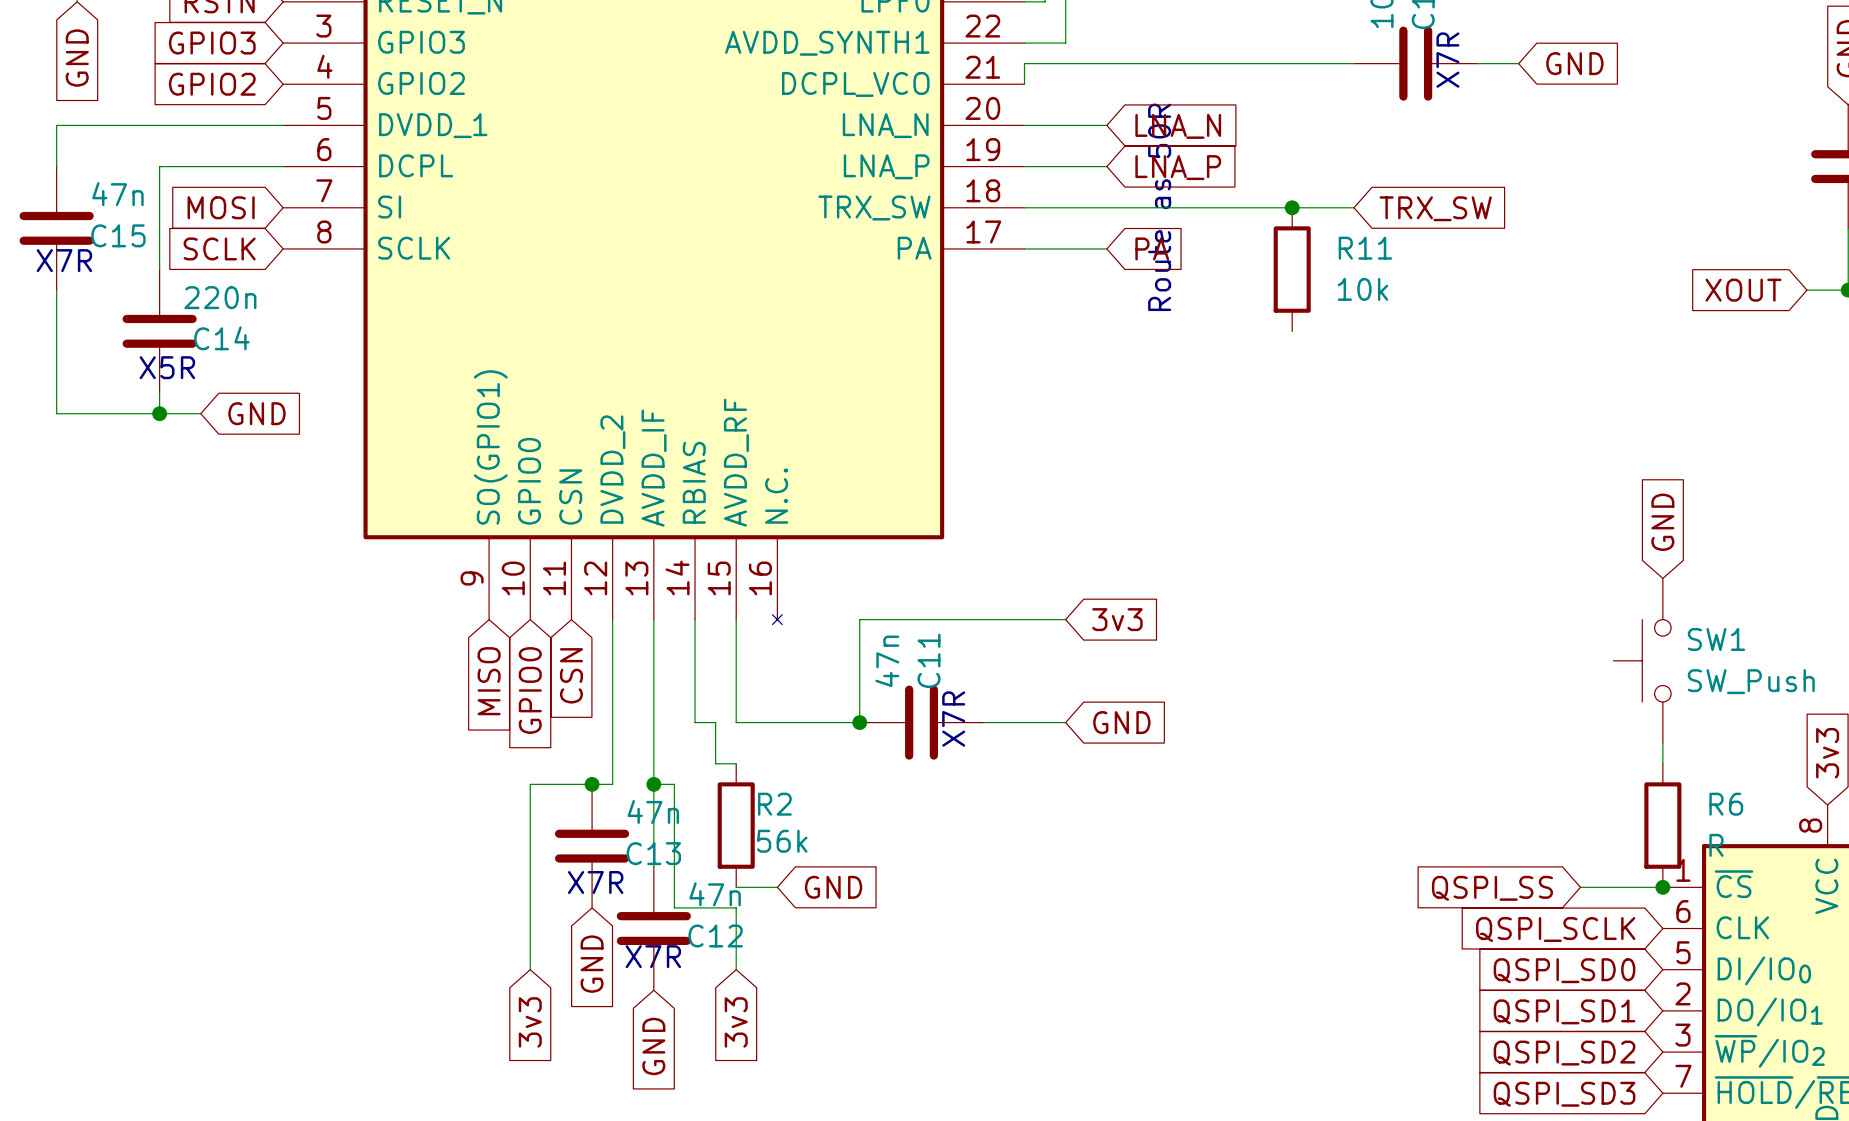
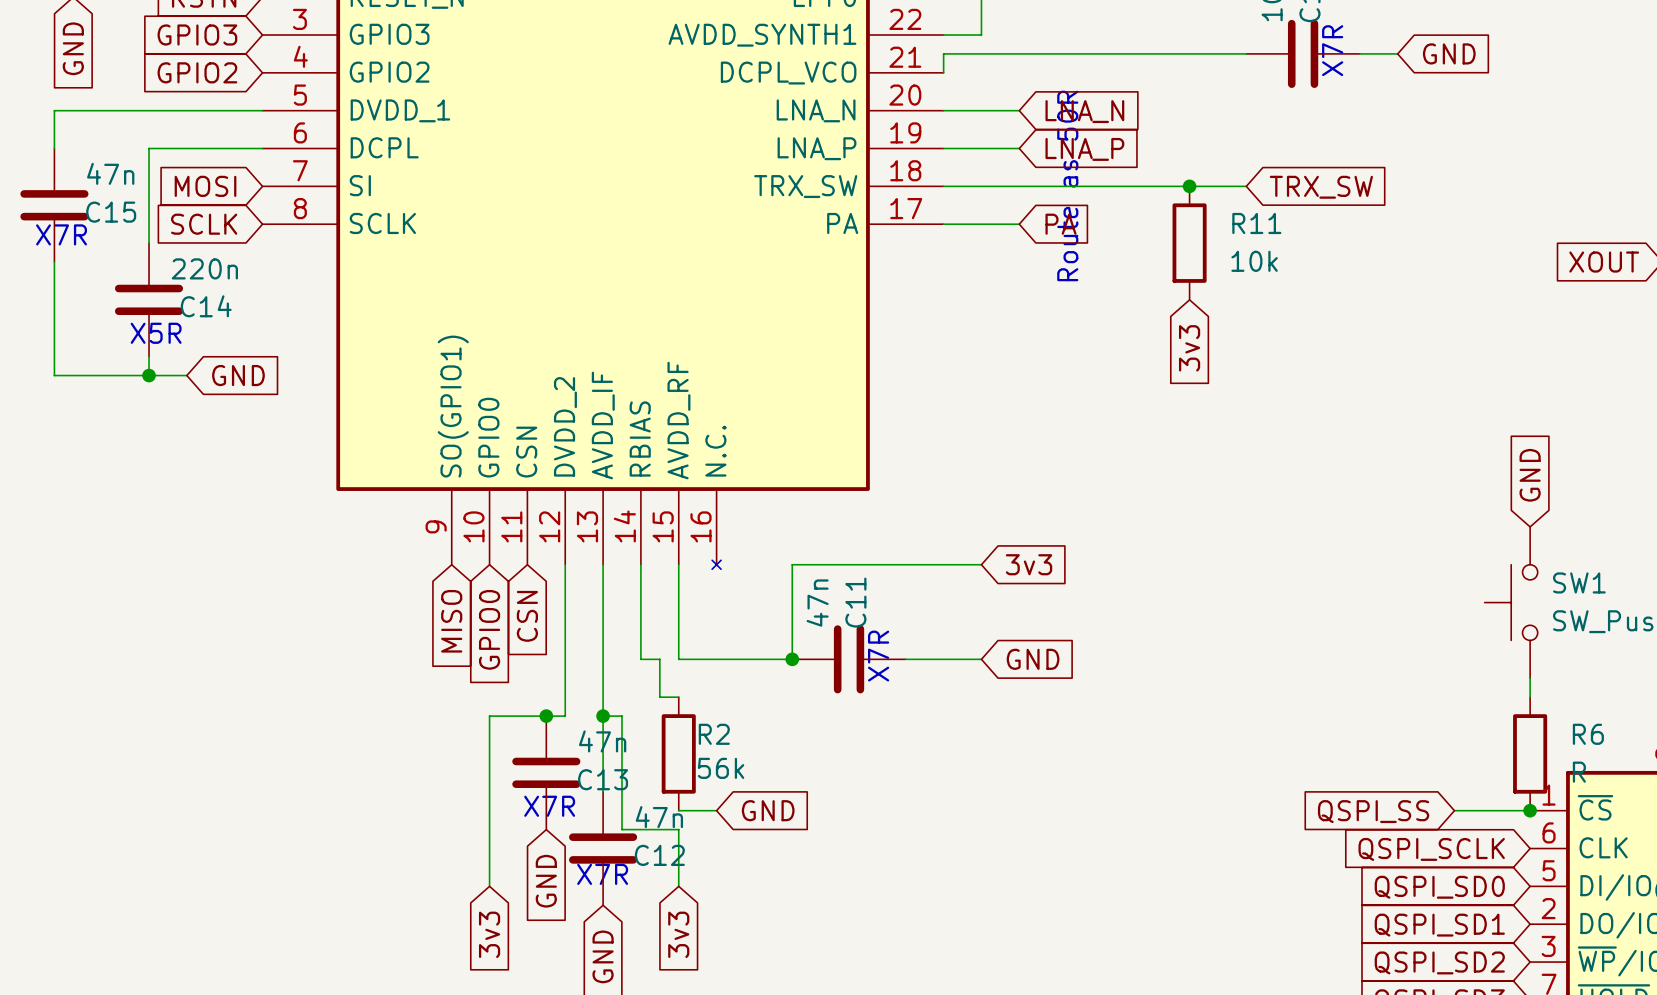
global label: none -> 3v3 (1189, 348)

